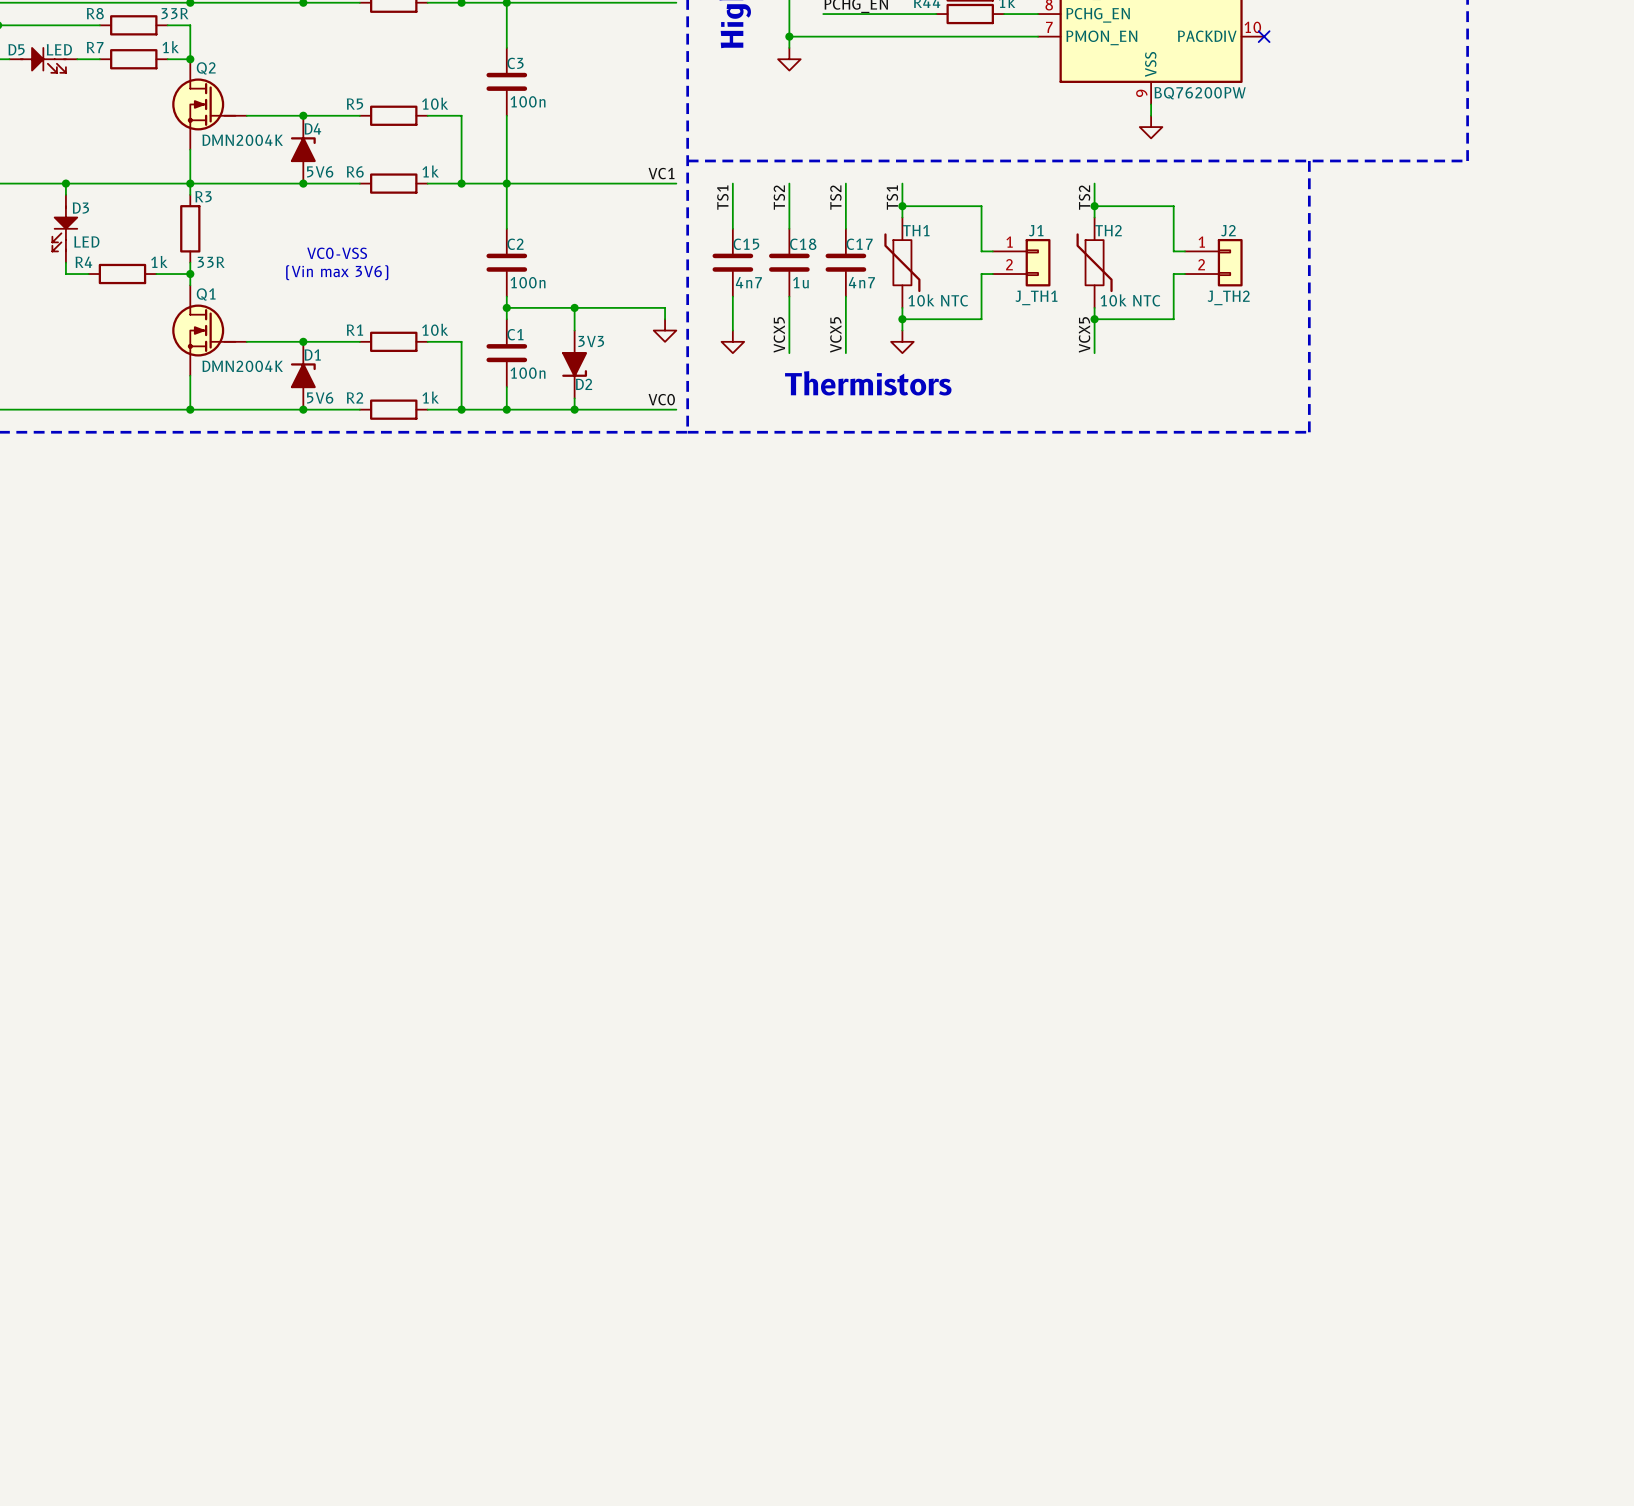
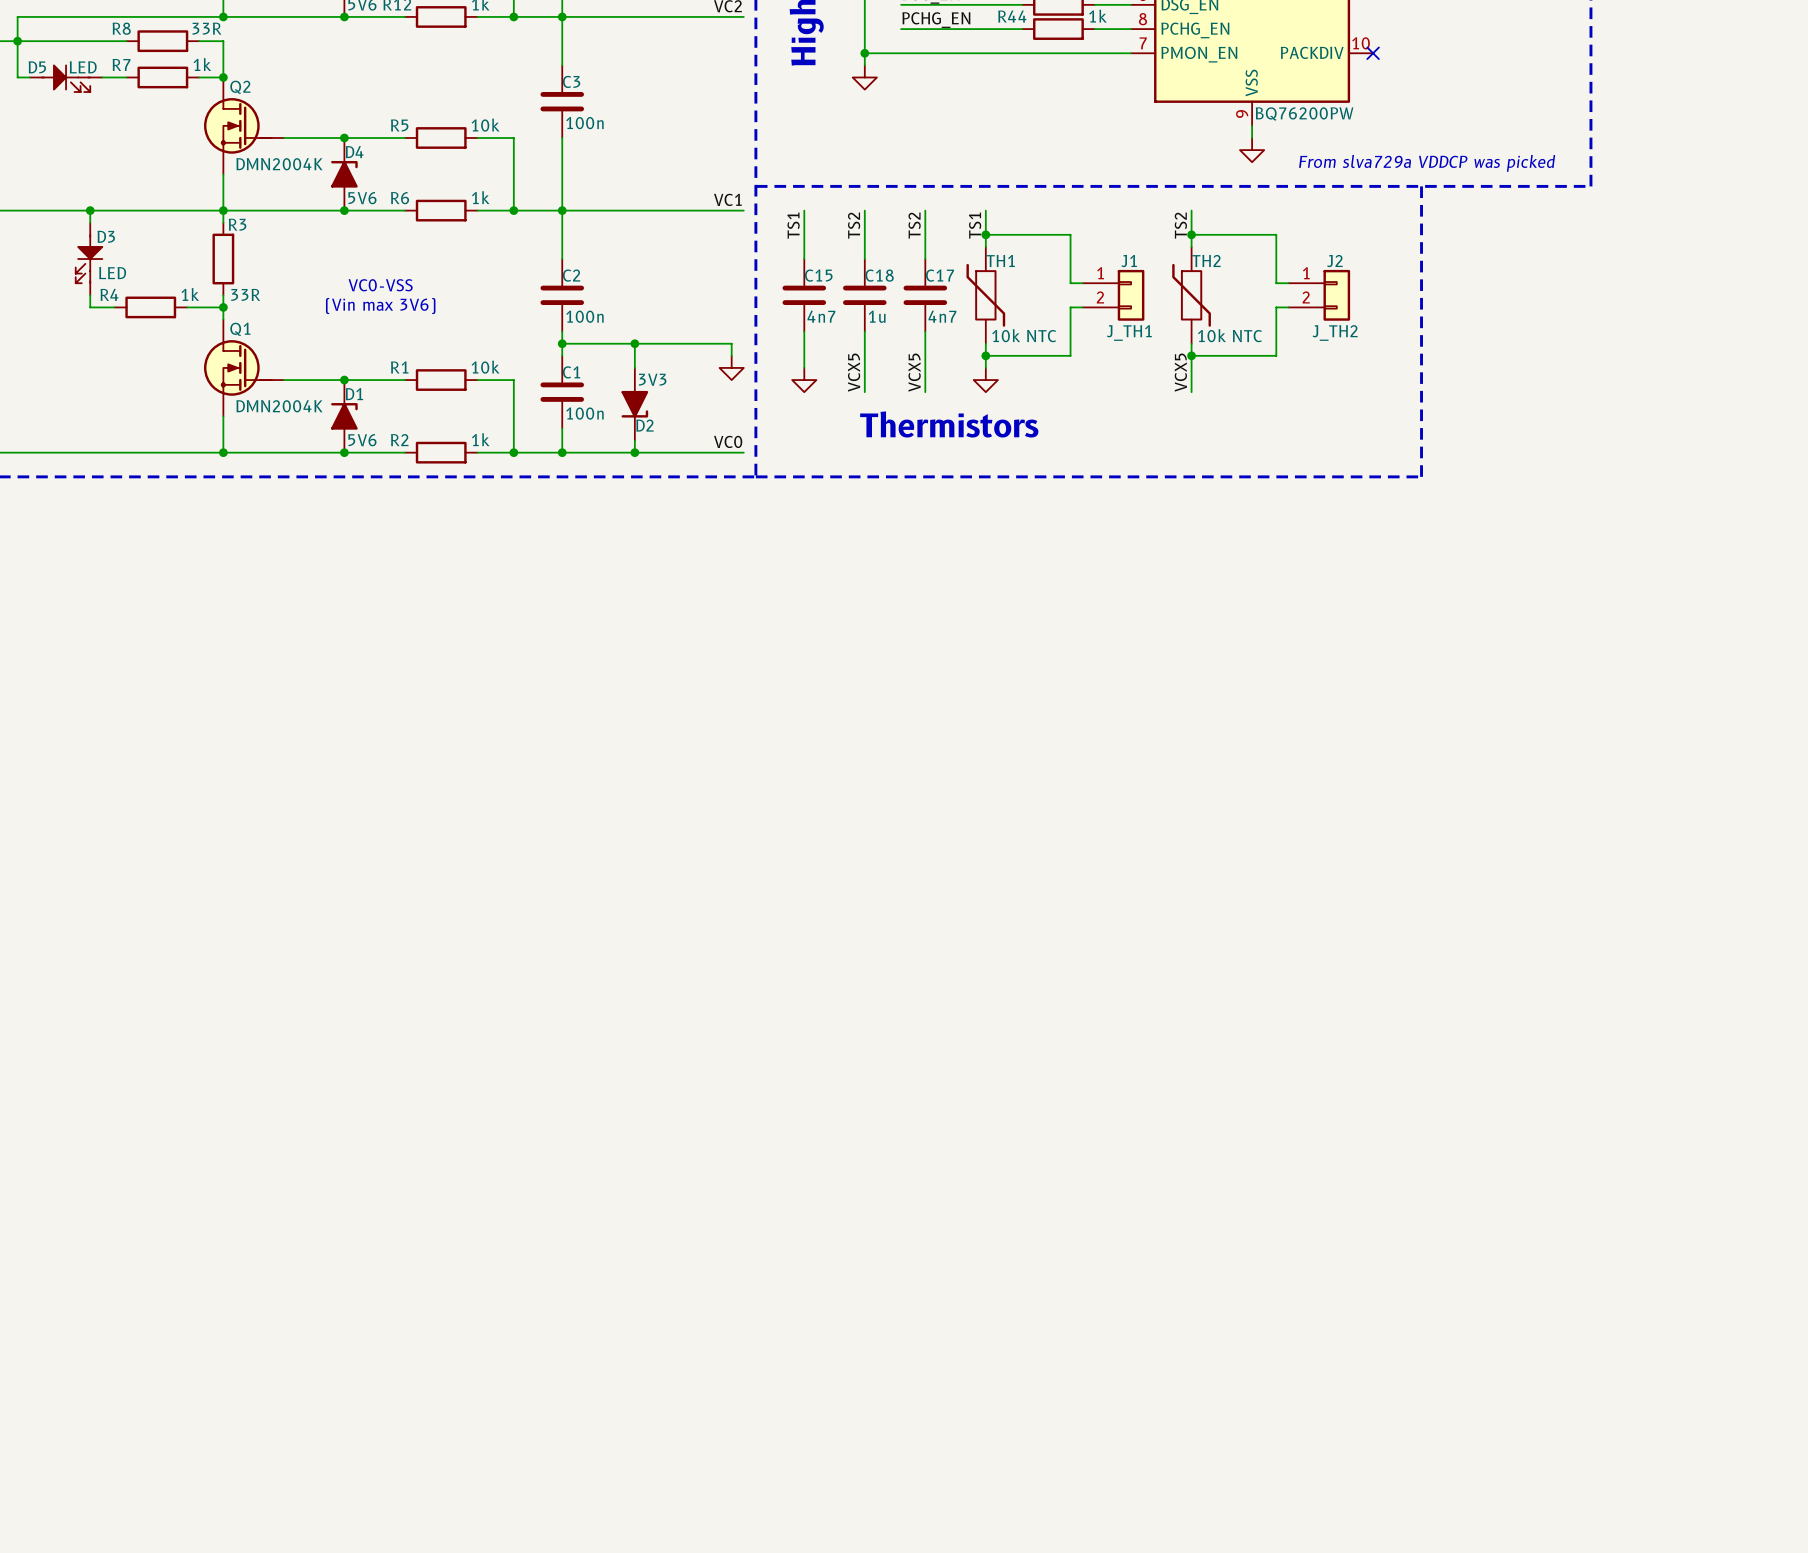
text: none -> From slva729a VDDCP was picked (1427, 163)

